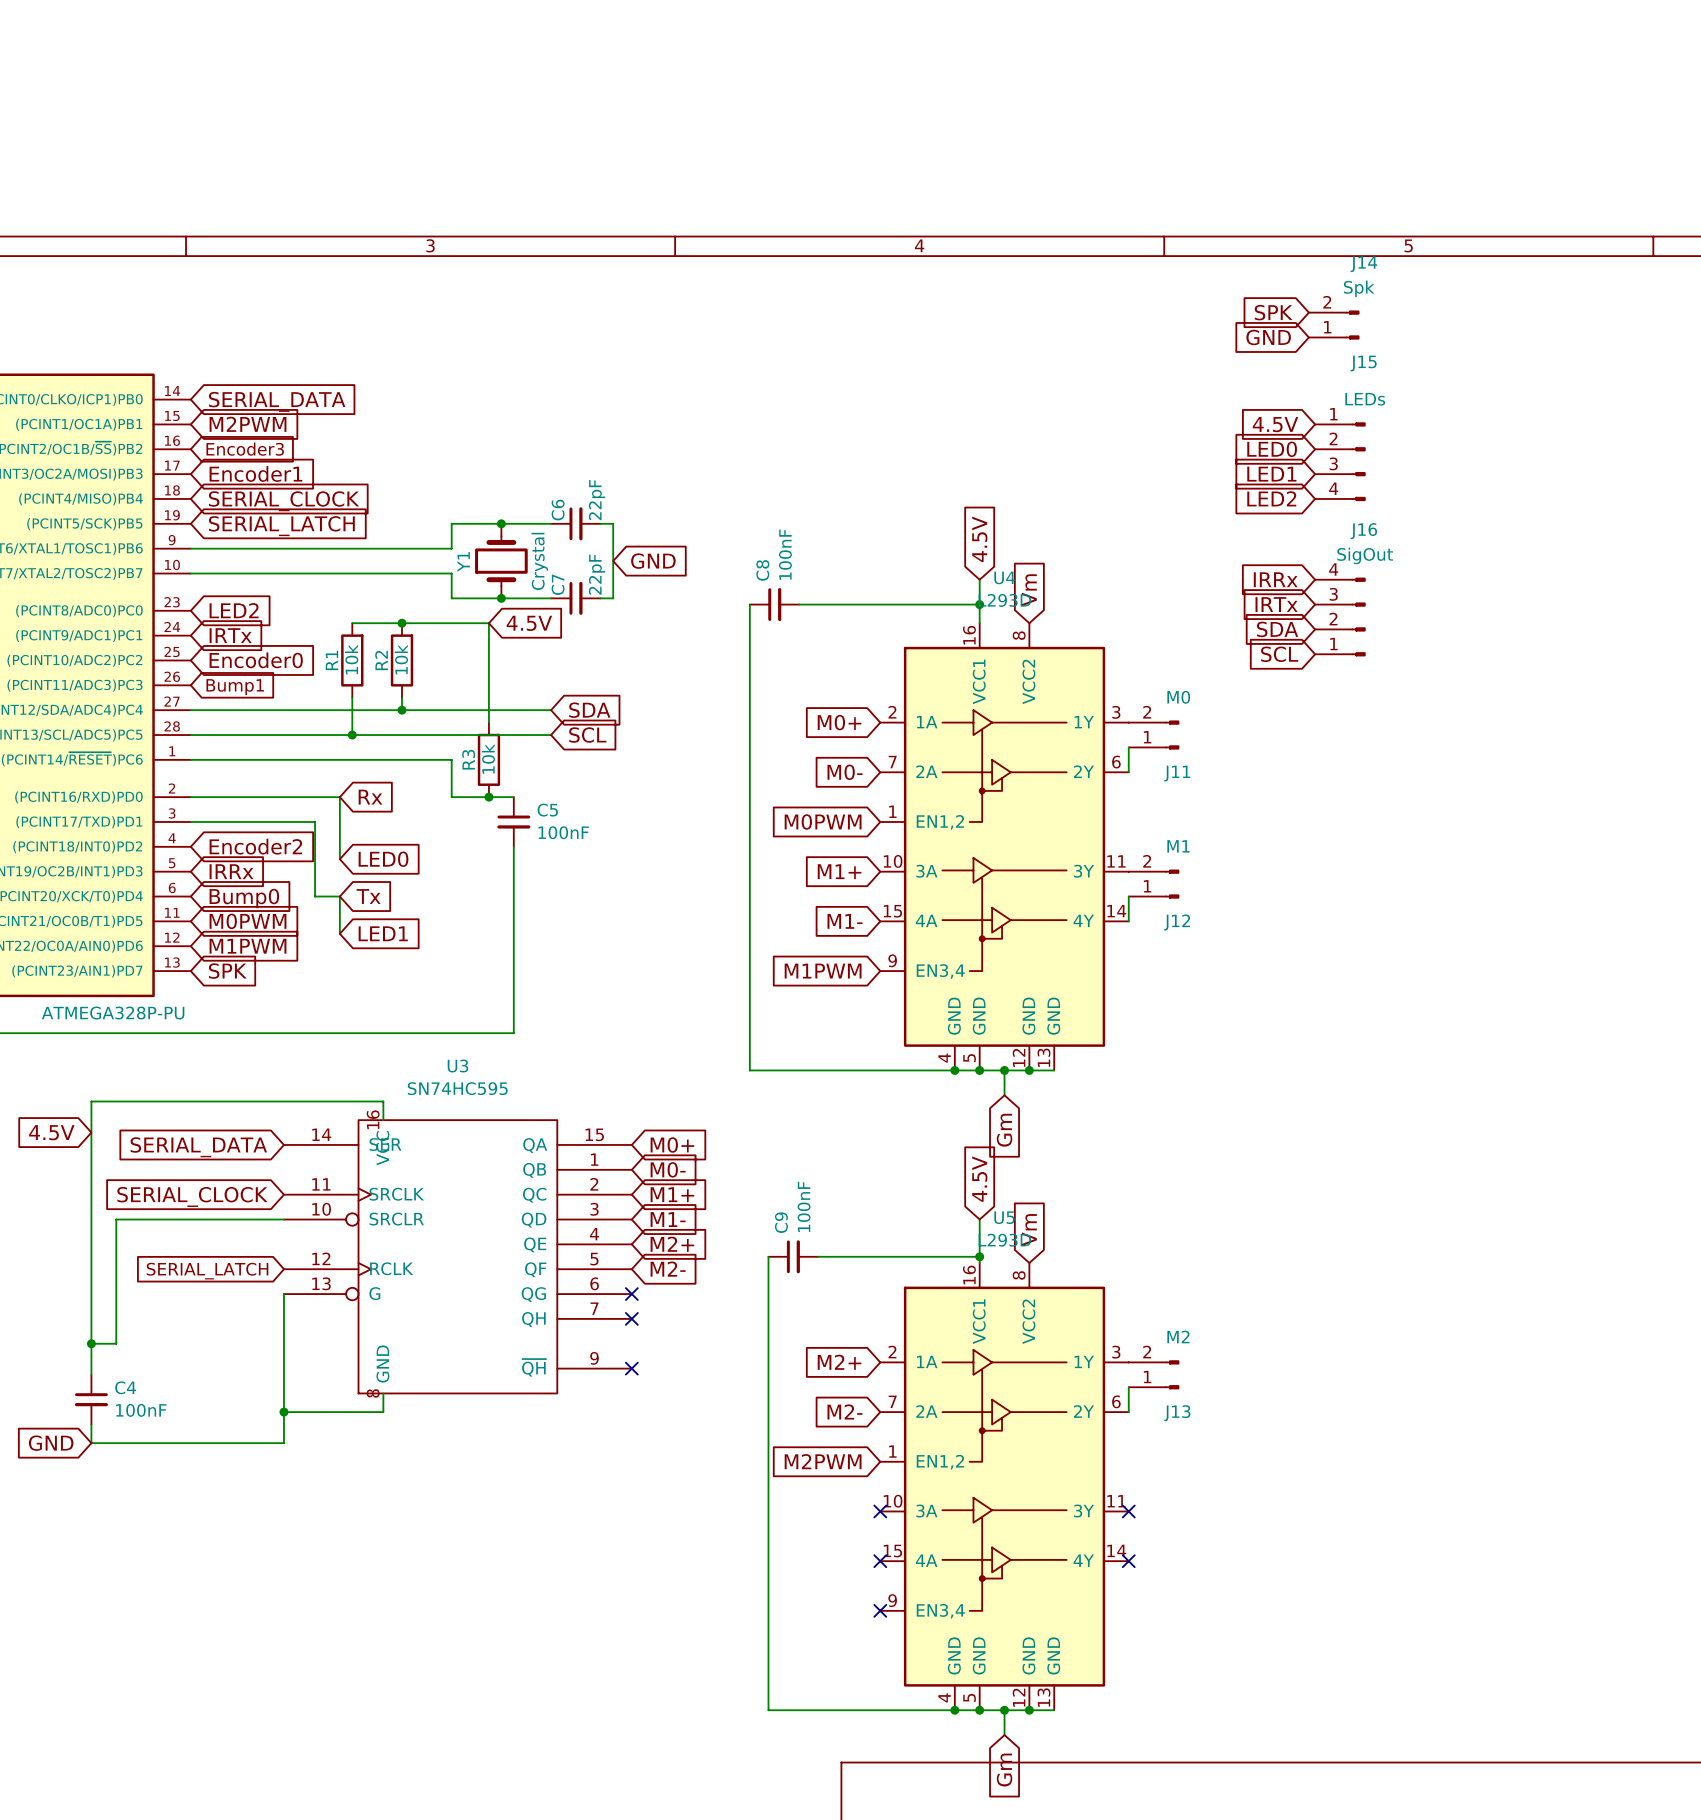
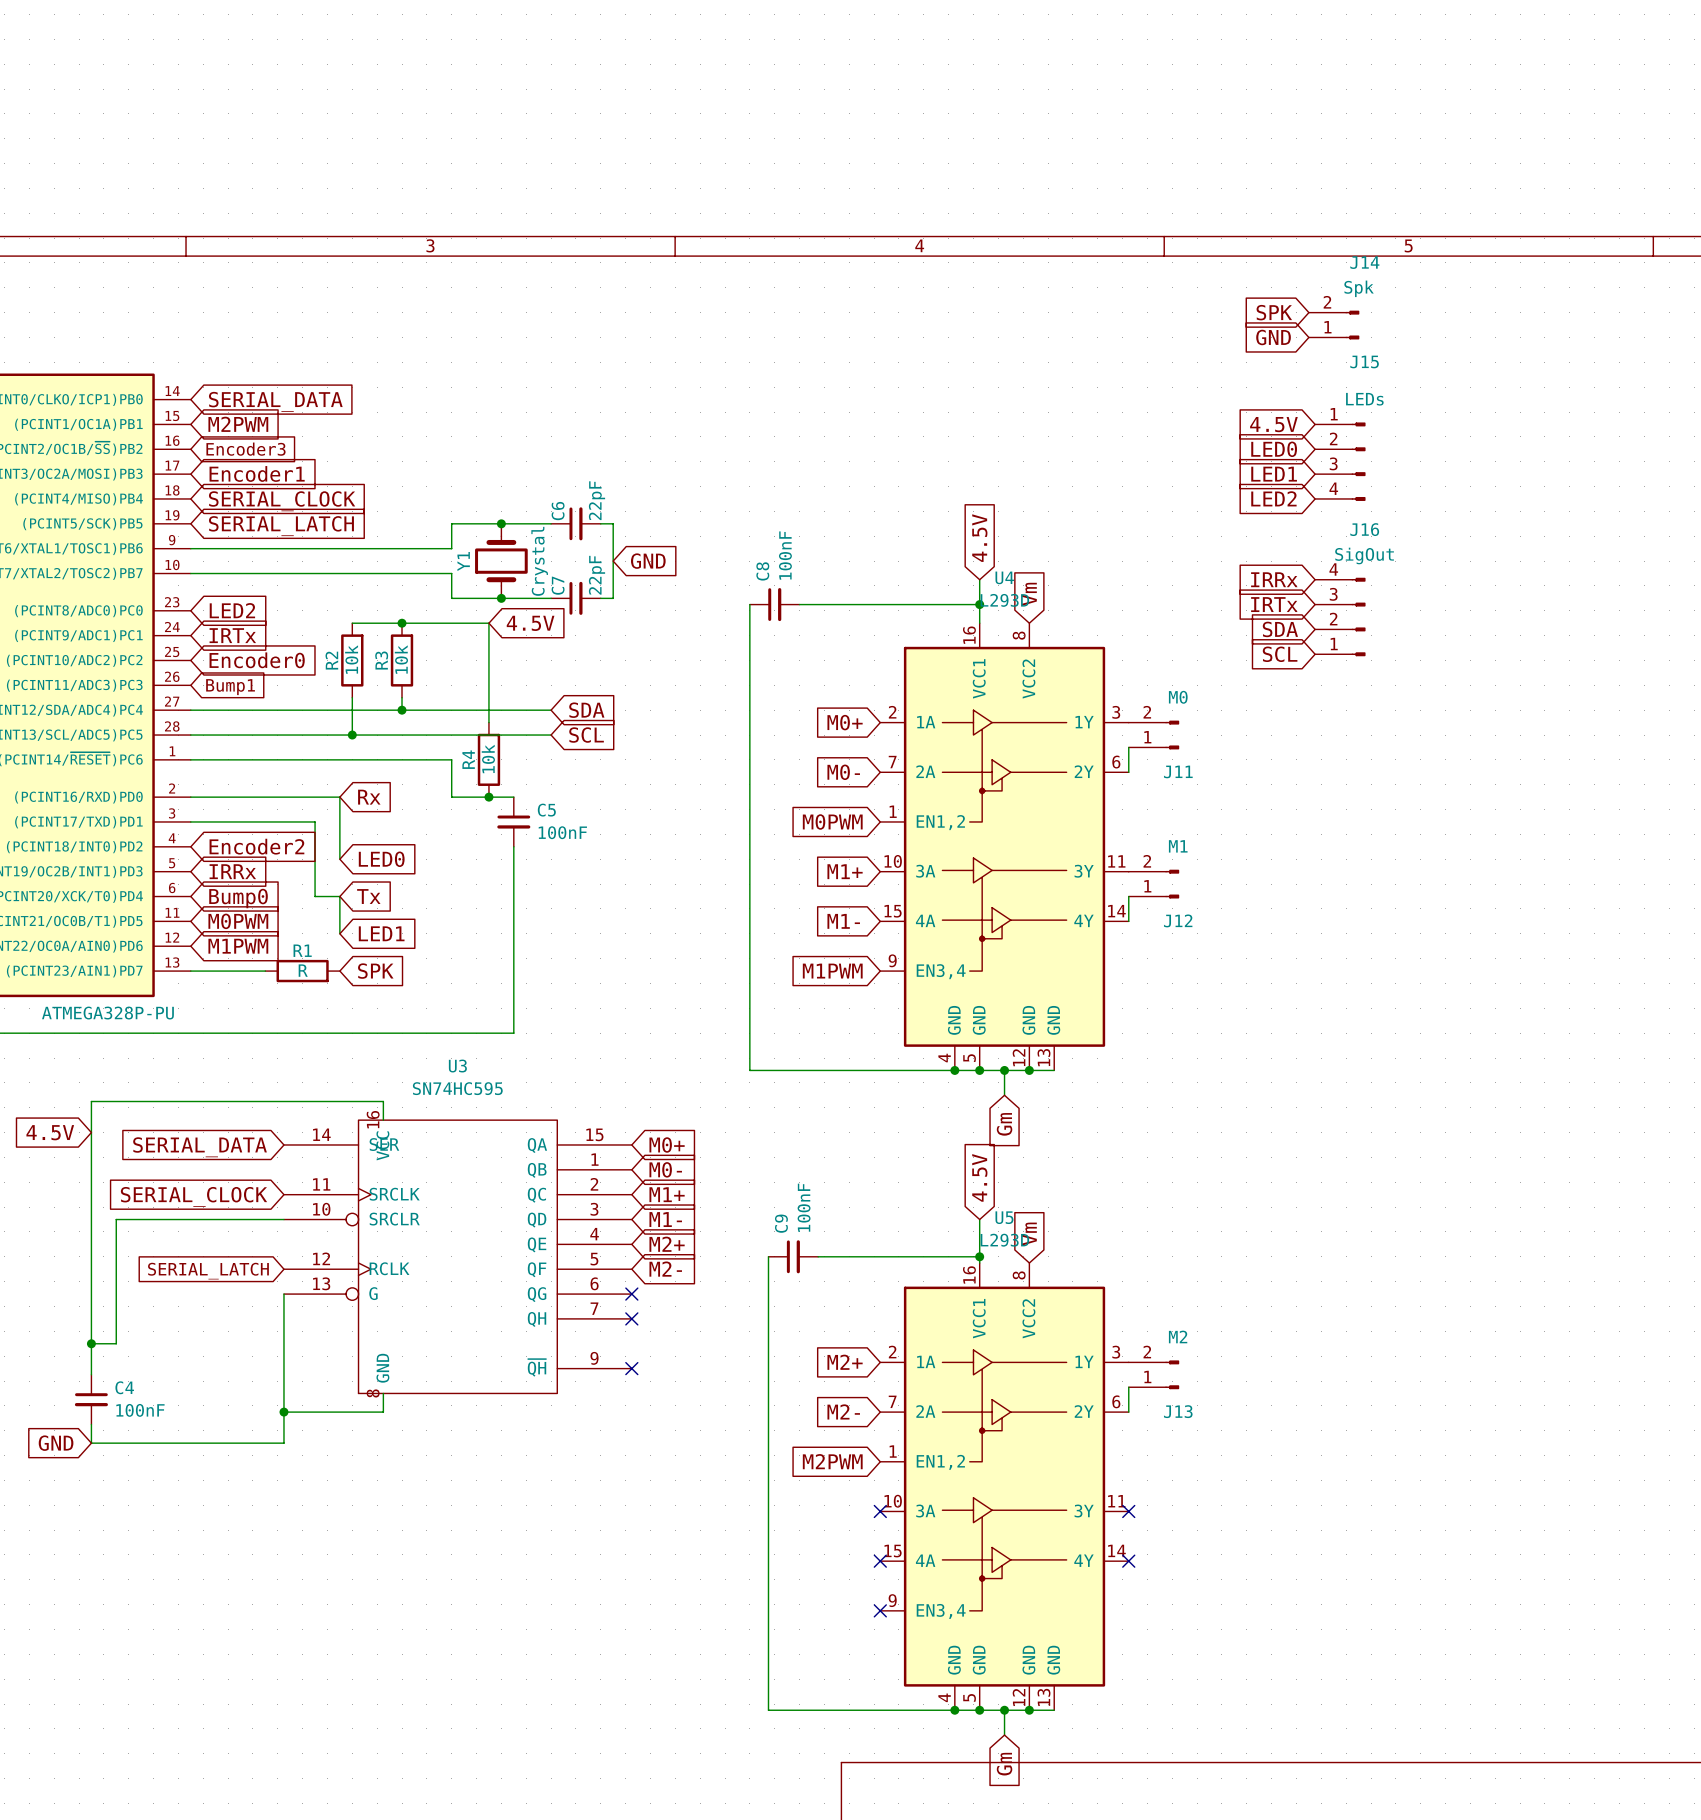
R1 name: R1 (331, 660) -> R2 (331, 660)
R2 name: R2 (381, 660) -> R3 (381, 660)
R3 name: R3 (468, 759) -> R4 (468, 759)
wire: none -> (190, 971) (265, 971)
global label position: SPK (227, 971) -> SPK (375, 971)
R1: none -> R (302, 971)

